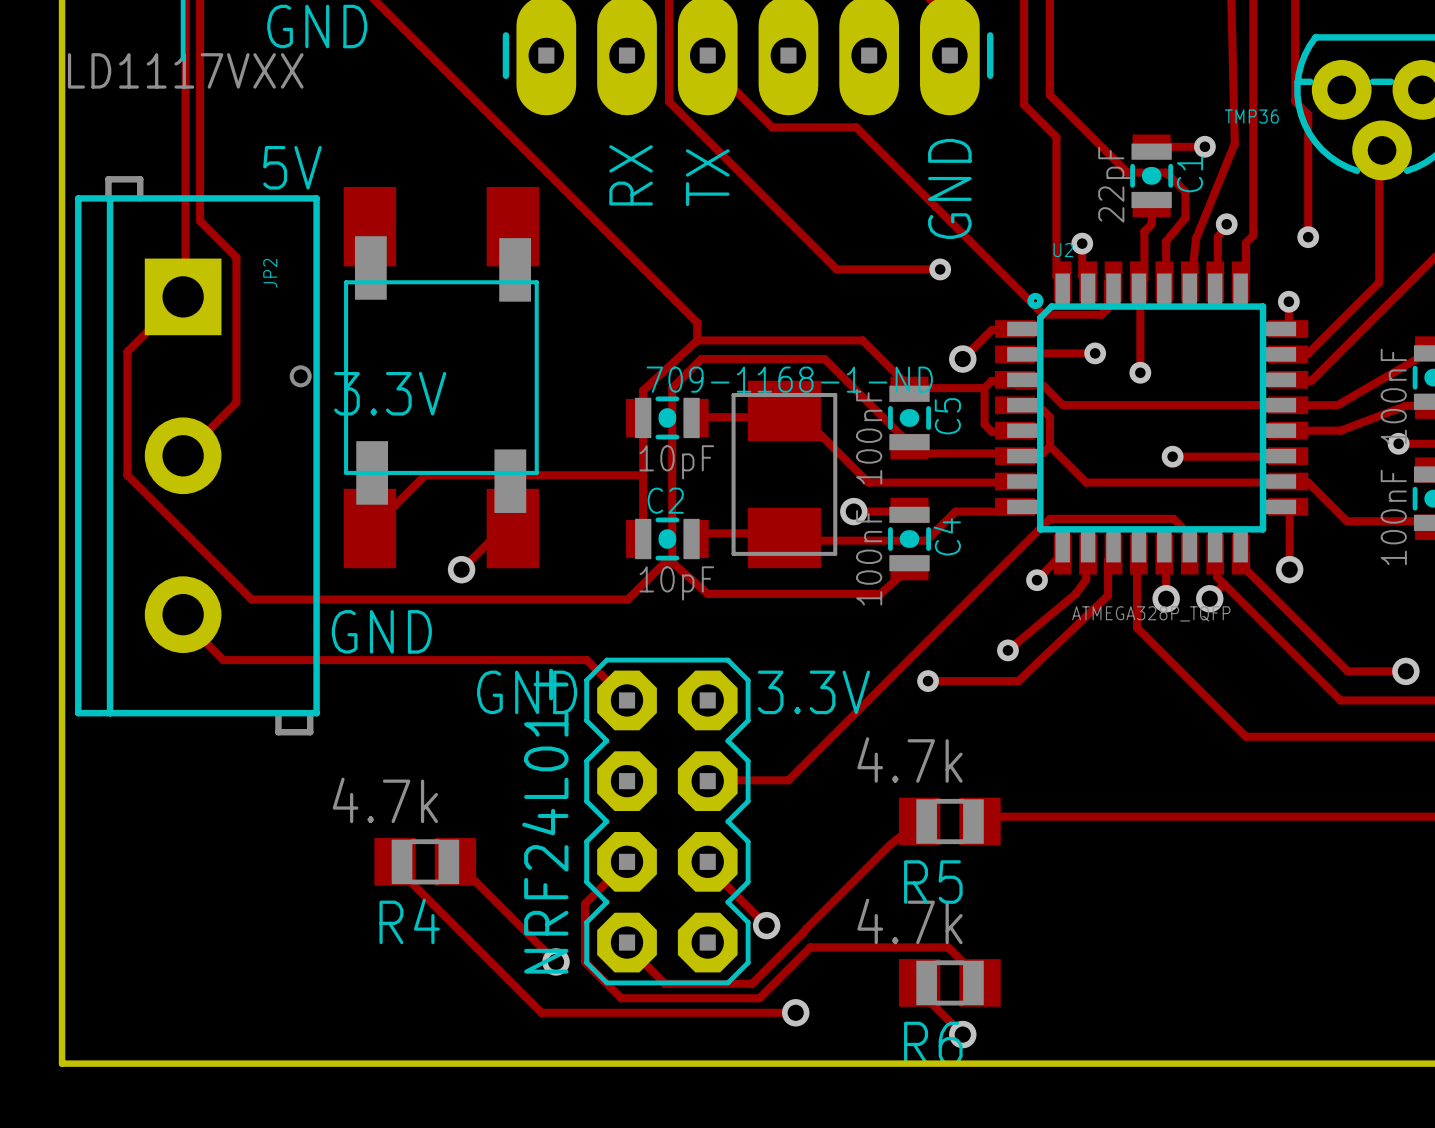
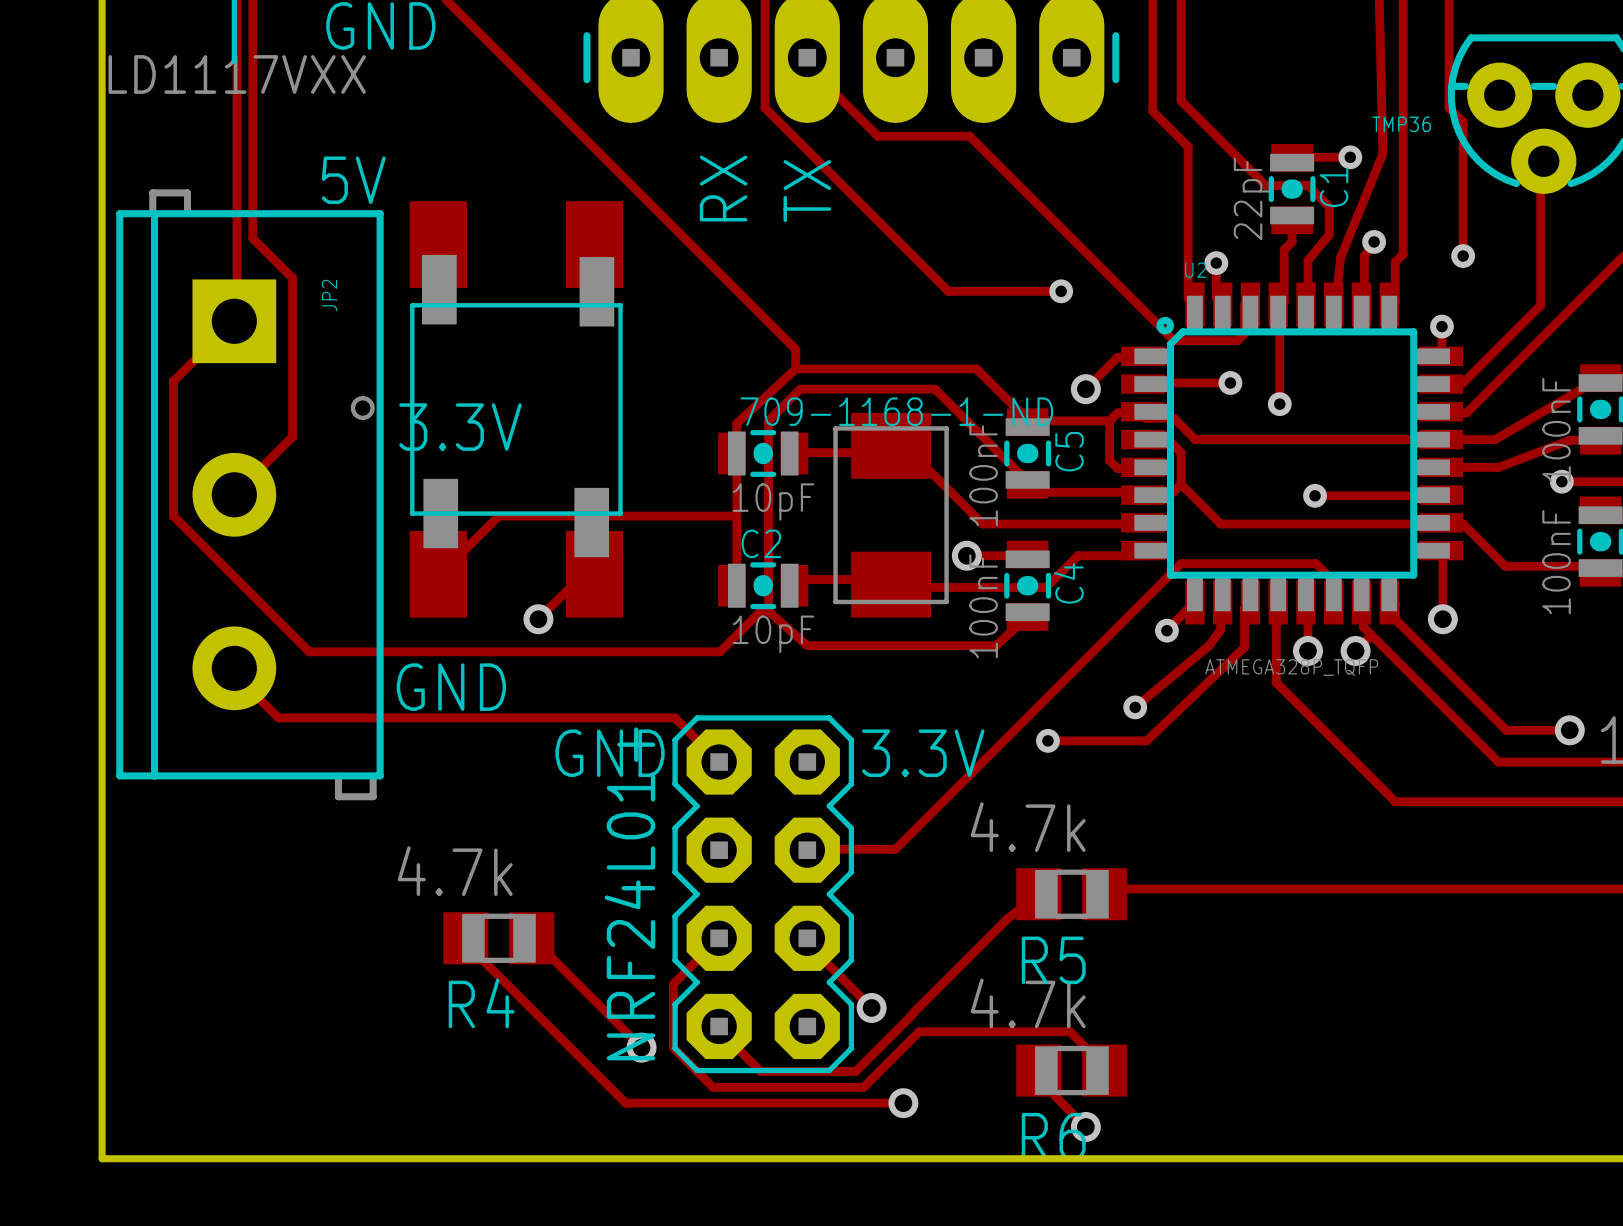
text: GND (949, 188) -> none

